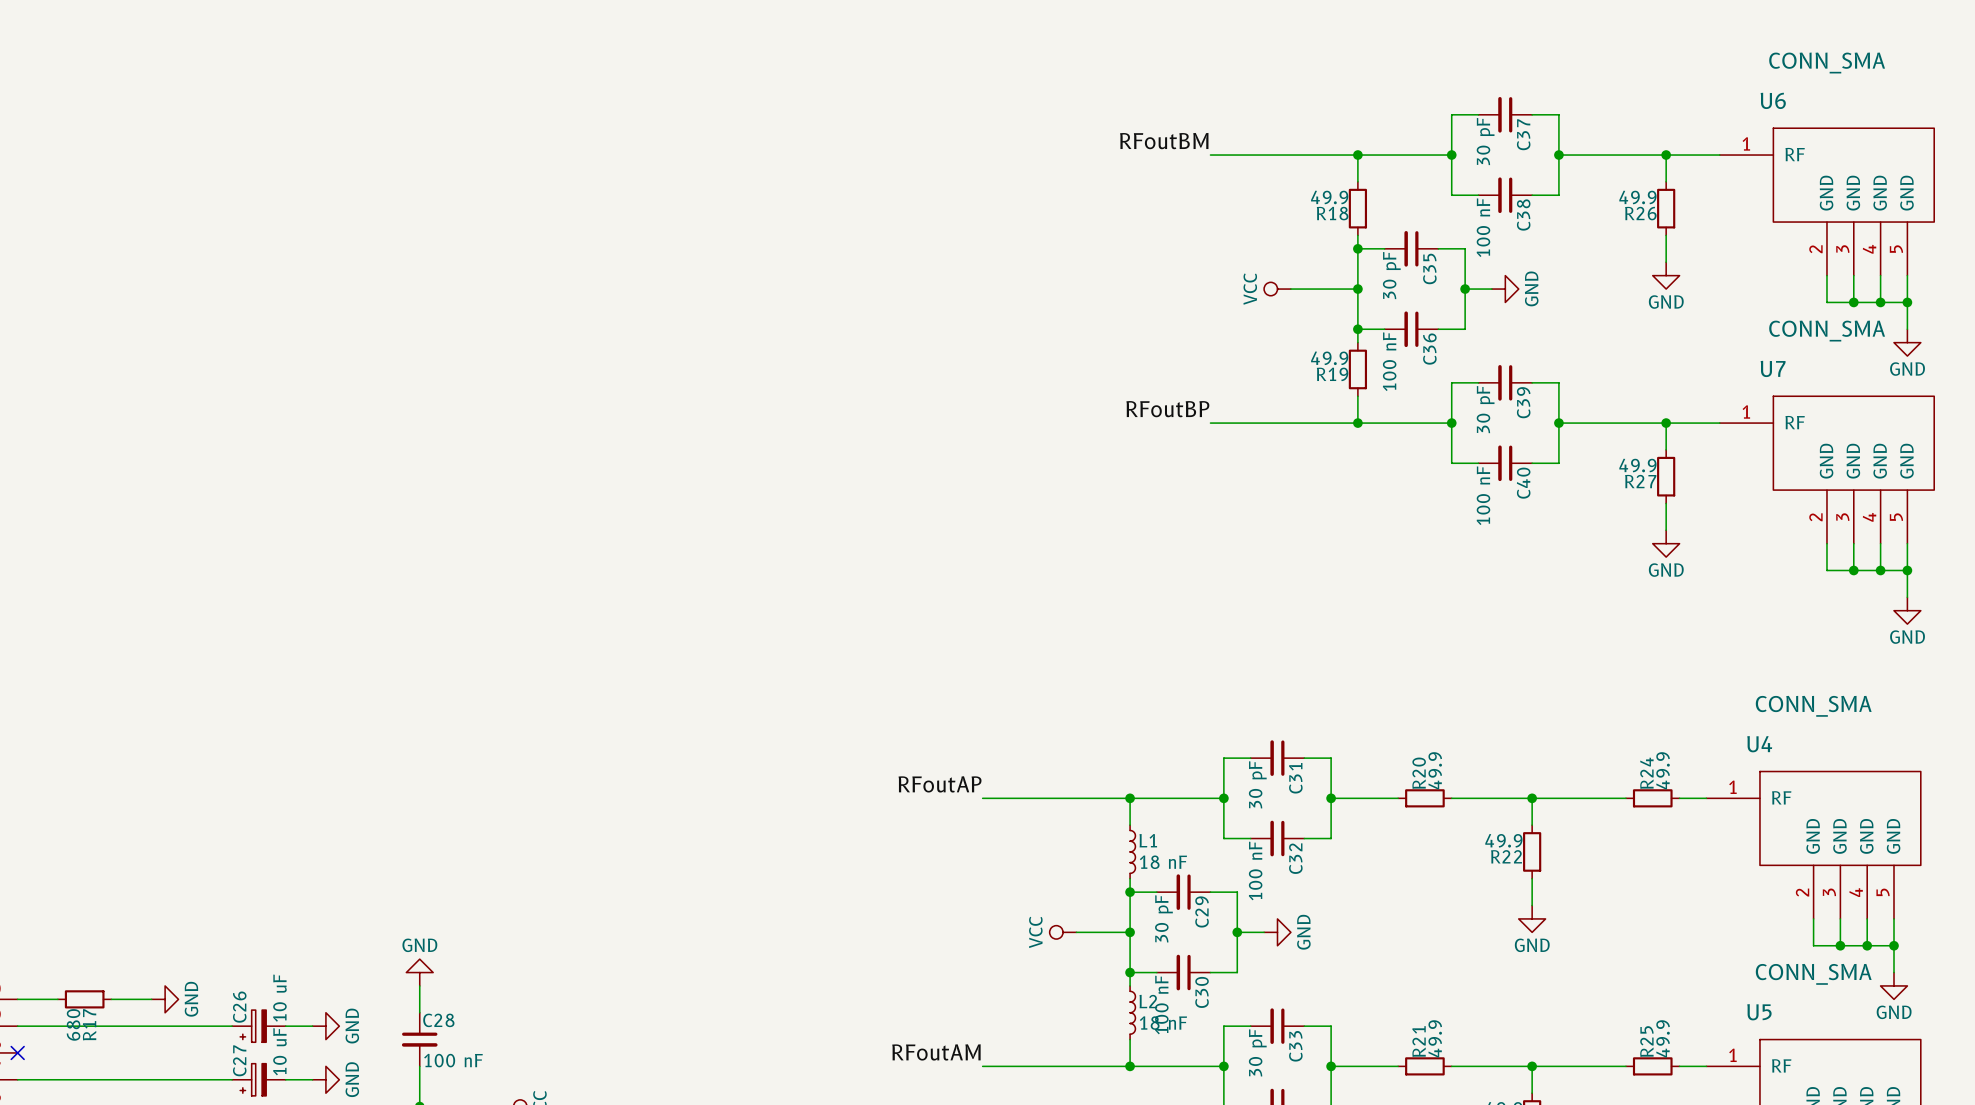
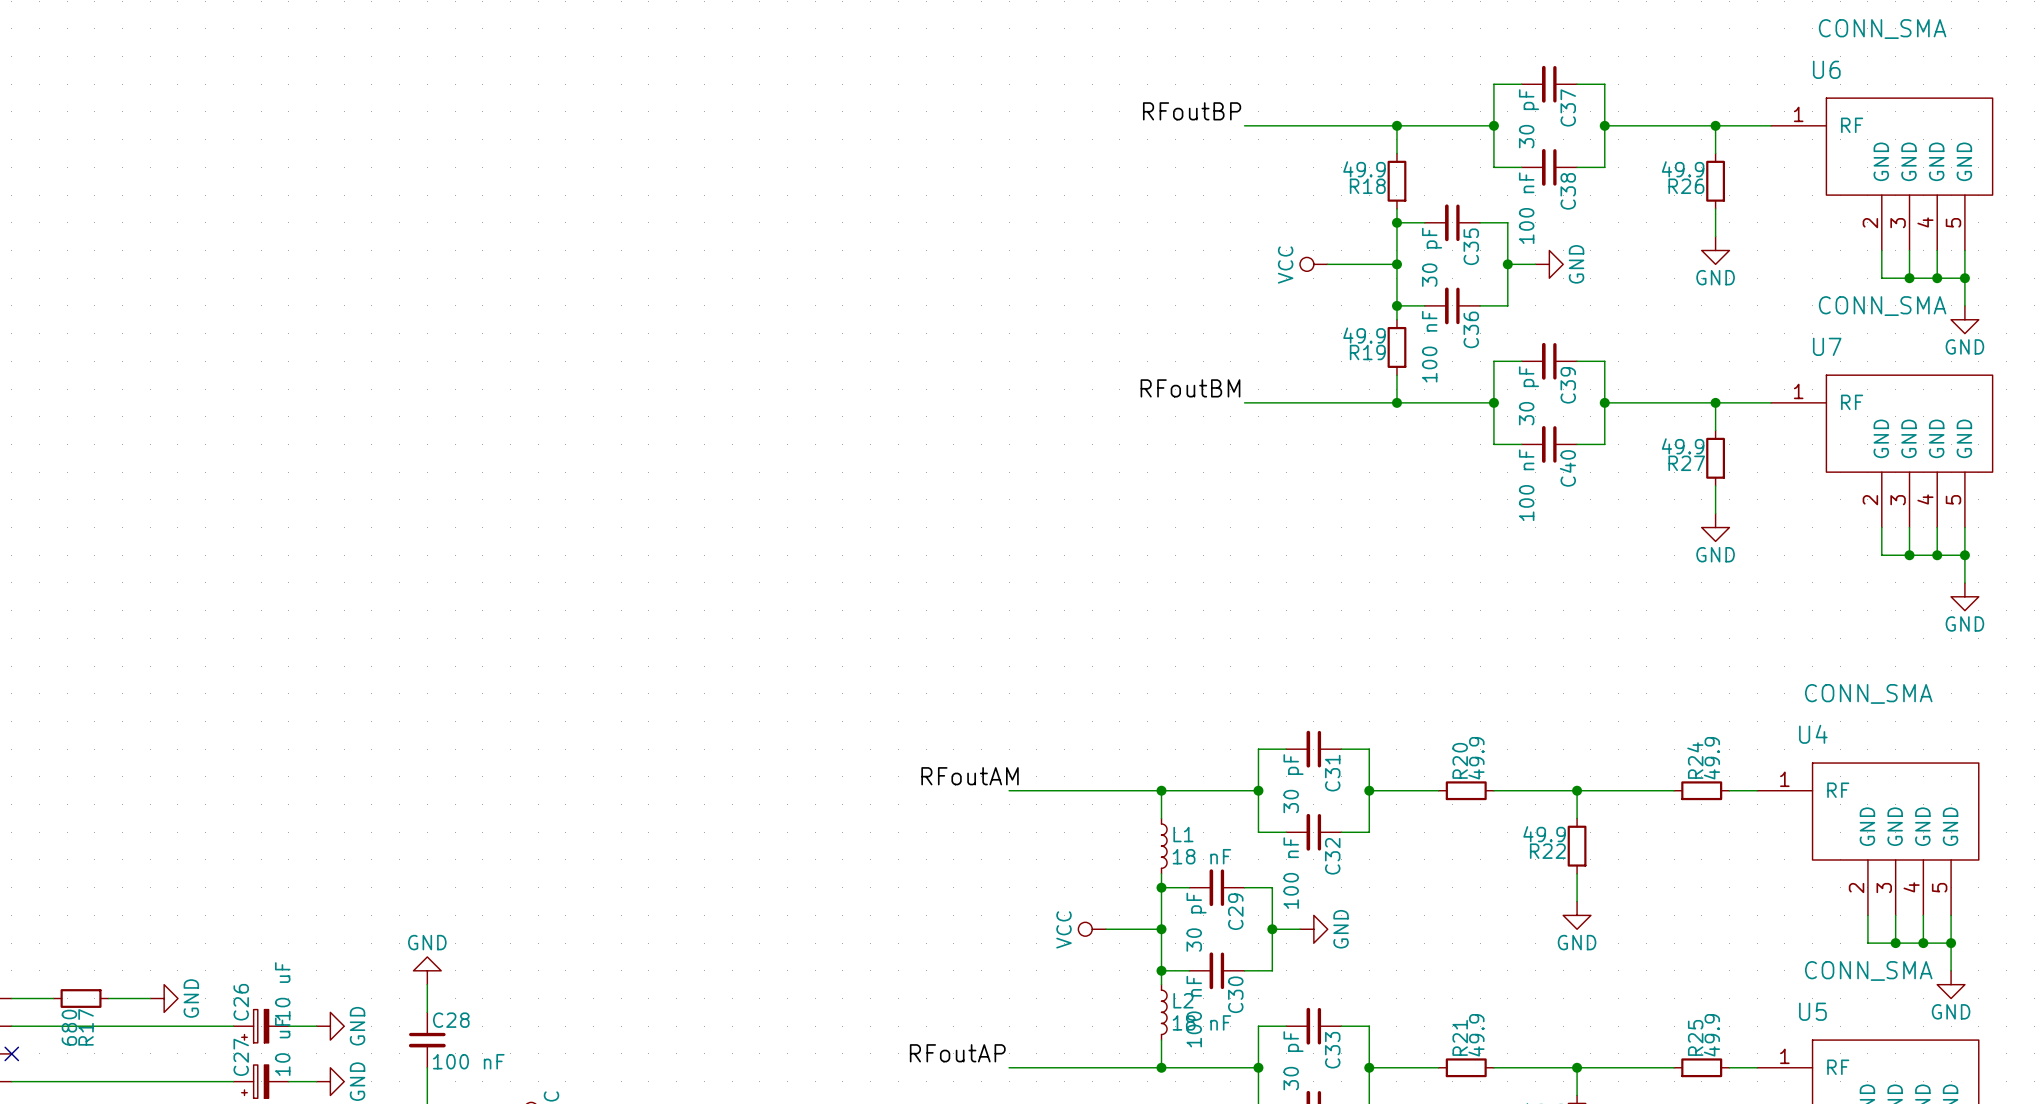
label: RFoutBM (1164, 141) -> RFoutBP (1192, 111)
label: RFoutBP (1167, 409) -> RFoutBM (1190, 388)
label: RFoutAP (940, 784) -> RFoutAM (970, 776)
label: RFoutAM (936, 1052) -> RFoutAP (957, 1053)

